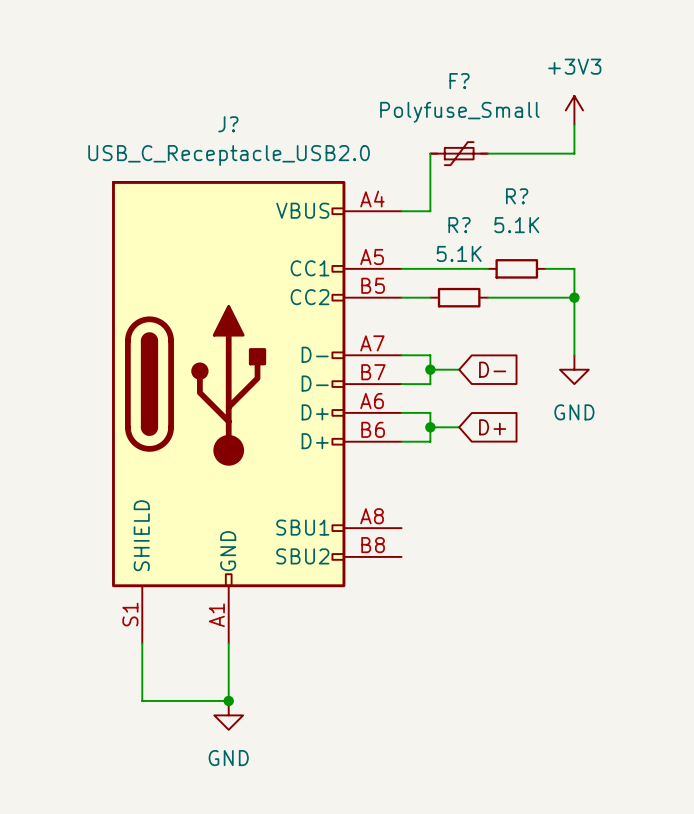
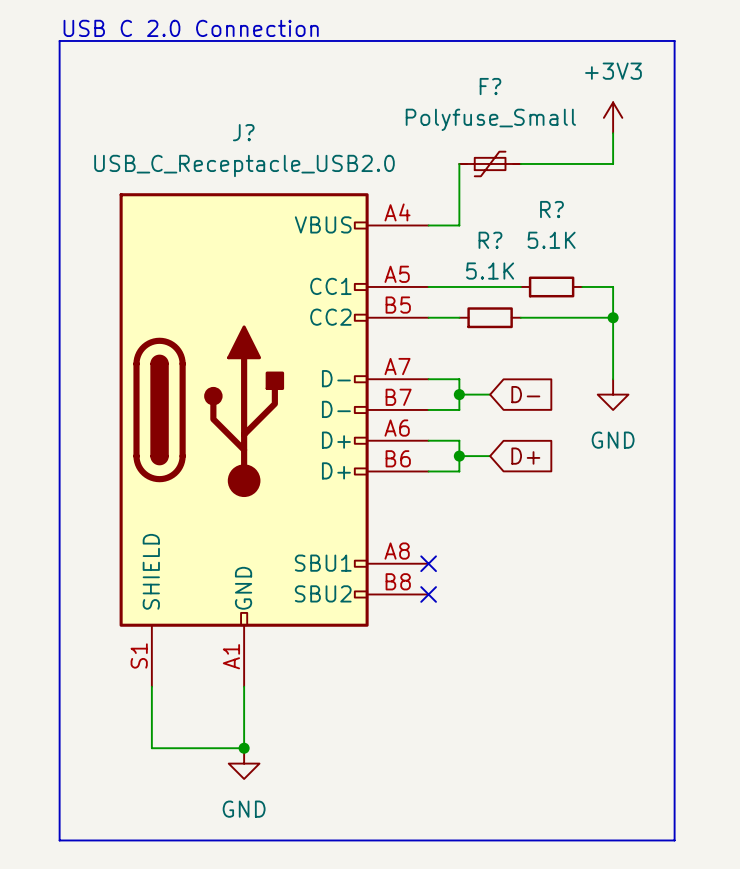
text: none -> USB C 2.0 Connection (191, 28)
line: none -> (59, 40) (674, 40) (674, 840) (59, 840) (59, 40)
no-connect mark: none -> (428, 563)
no-connect mark: none -> (428, 594)

